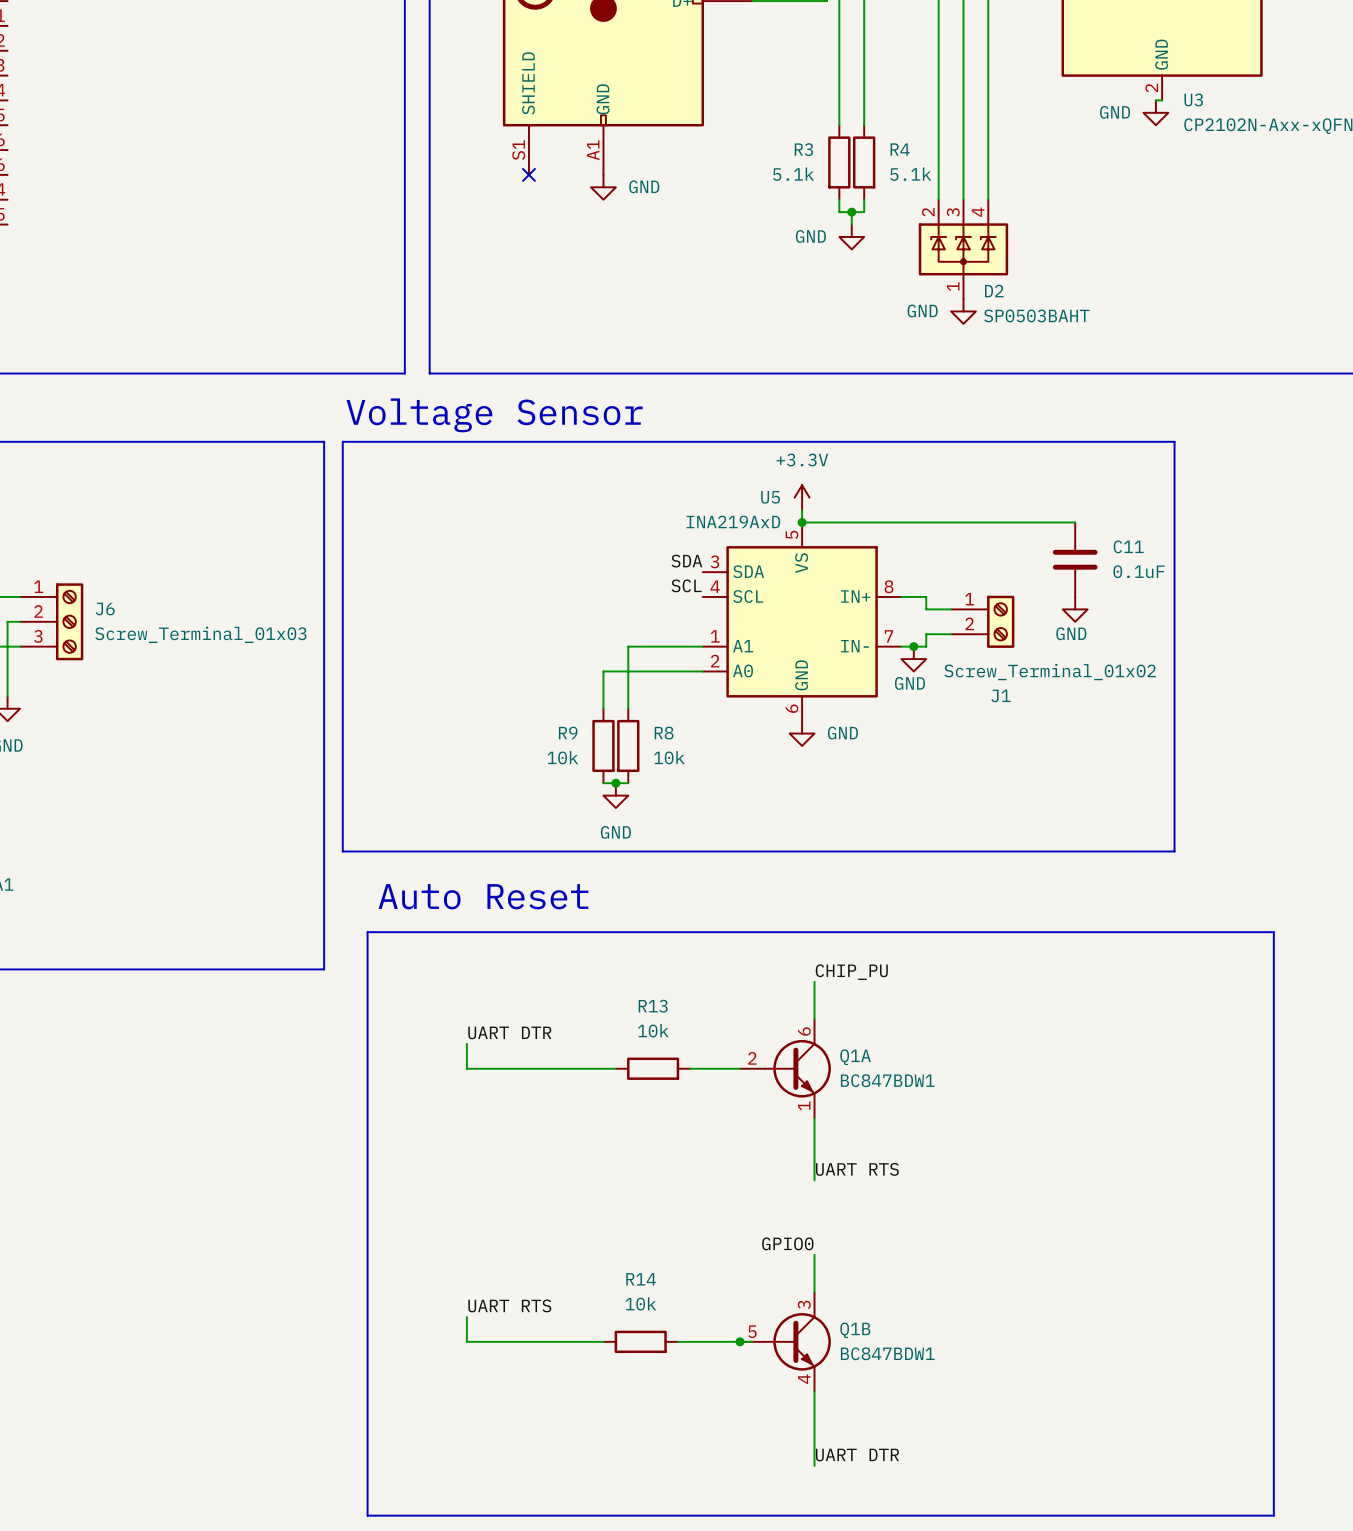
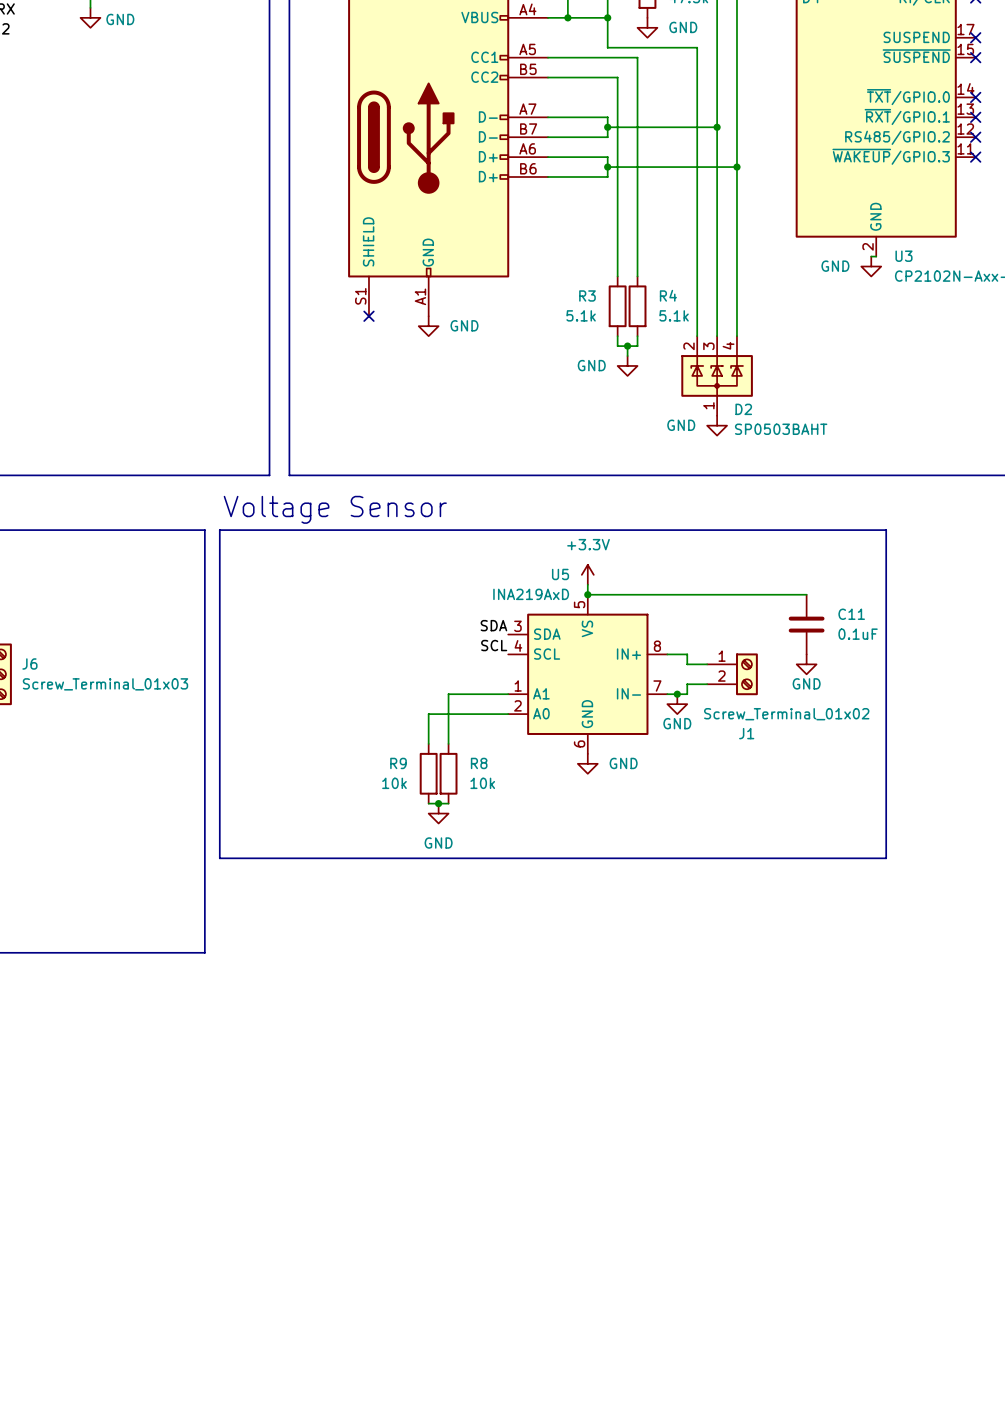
text: Auto Reset (483, 896) -> none
line: (367, 932) (1273, 932) (1273, 1515) (367, 1515) (367, 932) -> none
label: CHIP_PU (851, 972) -> none
wire: (814, 981) (814, 1019) -> none
label: UART DTR (509, 1032) -> none
wire: (466, 1043) (466, 1068) (615, 1068) -> none
R13: 10k (653, 1068) -> none
wire: (690, 1068) (740, 1068) -> none
Q1A: BC847BDW1 (785, 1068) -> none
wire: (814, 1118) (814, 1180) -> none
label: UART RTS (857, 1169) -> none
label: GPIO0 (787, 1243) -> none
wire: (814, 1254) (814, 1292) -> none
label: UART RTS (509, 1305) -> none
wire: (466, 1317) (466, 1341) (603, 1341) -> none
R14: 10k (640, 1341) -> none
wire: (677, 1341) (752, 1341) -> none
junction: (740, 1341) -> none
Q1B: BC847BDW1 (785, 1341) -> none
wire: (814, 1391) (814, 1465) -> none
label: UART DTR (857, 1455) -> none

